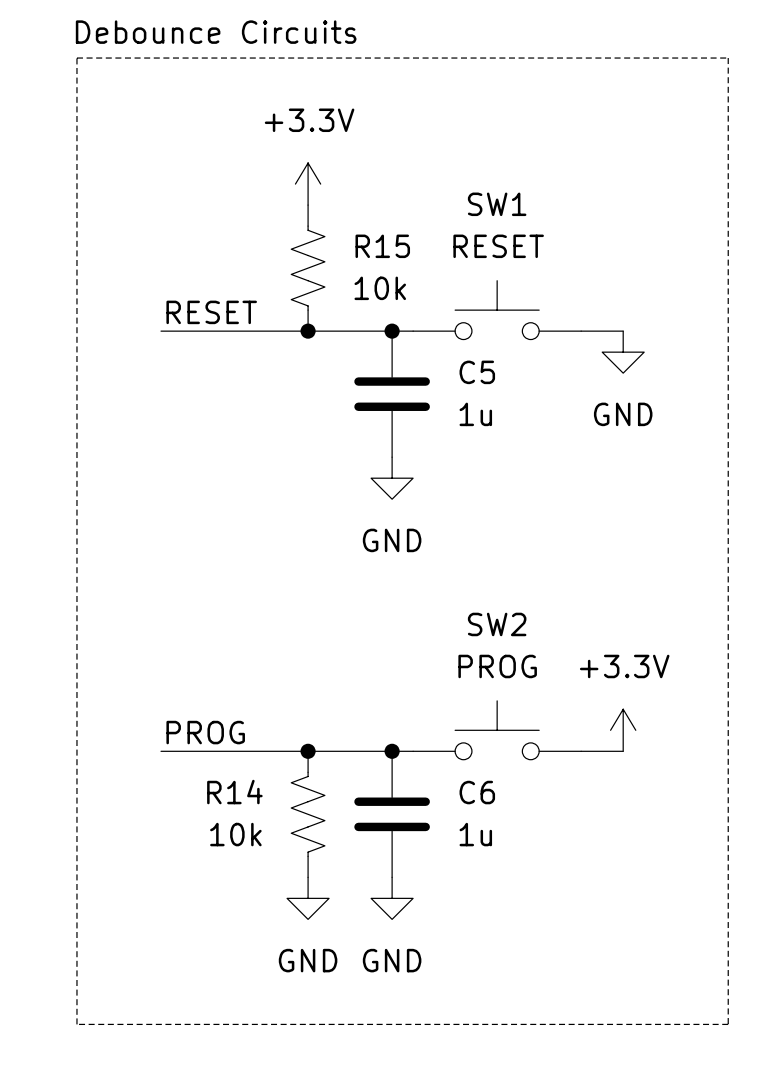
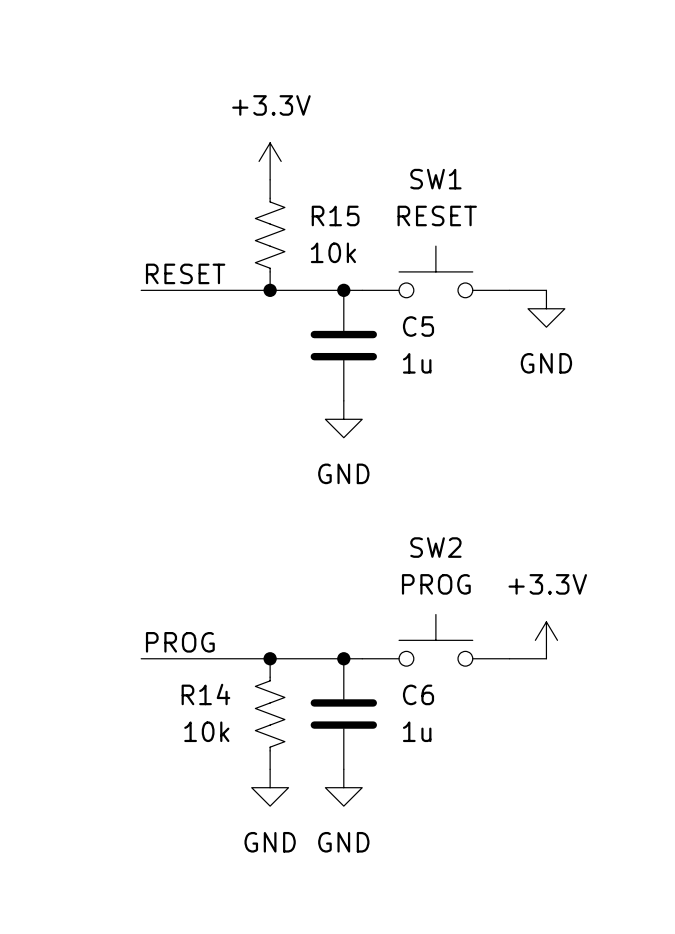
text: Debounce Circuits (216, 32) -> none
line: (76, 58) (728, 58) (728, 1024) (76, 1024) (76, 58) -> none

